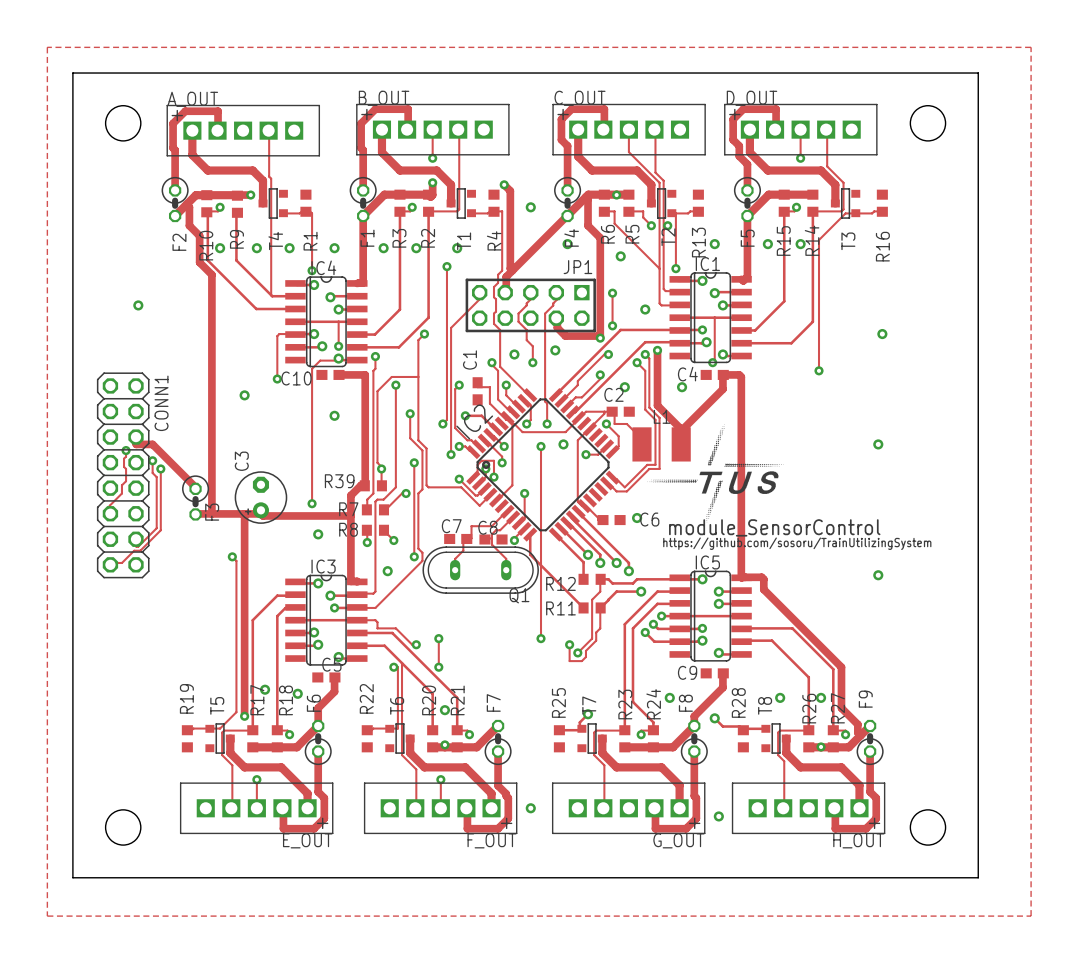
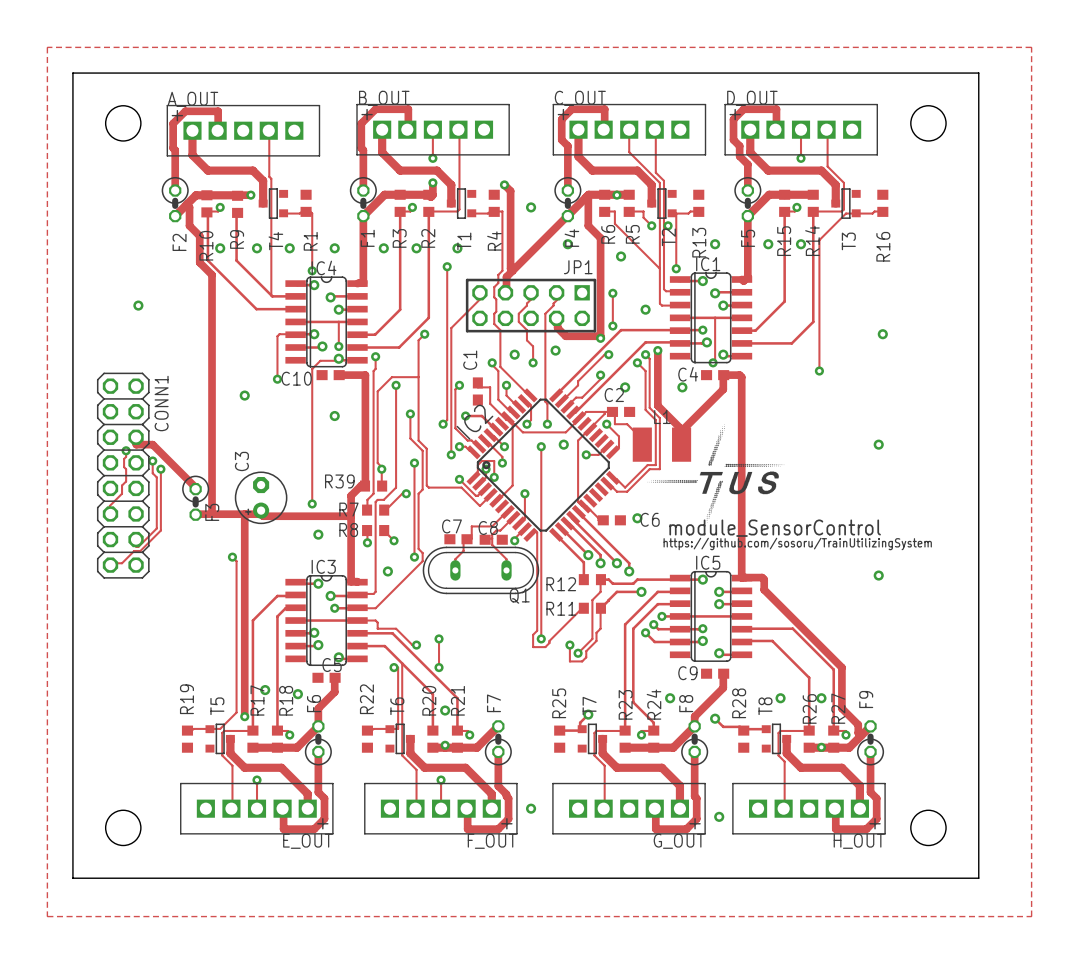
track: (530, 534) (530, 554) (583, 607) -> (530, 534) (535, 530) (537, 532) (537, 630) (533, 634) (533, 647) (545, 647) (583, 608)

